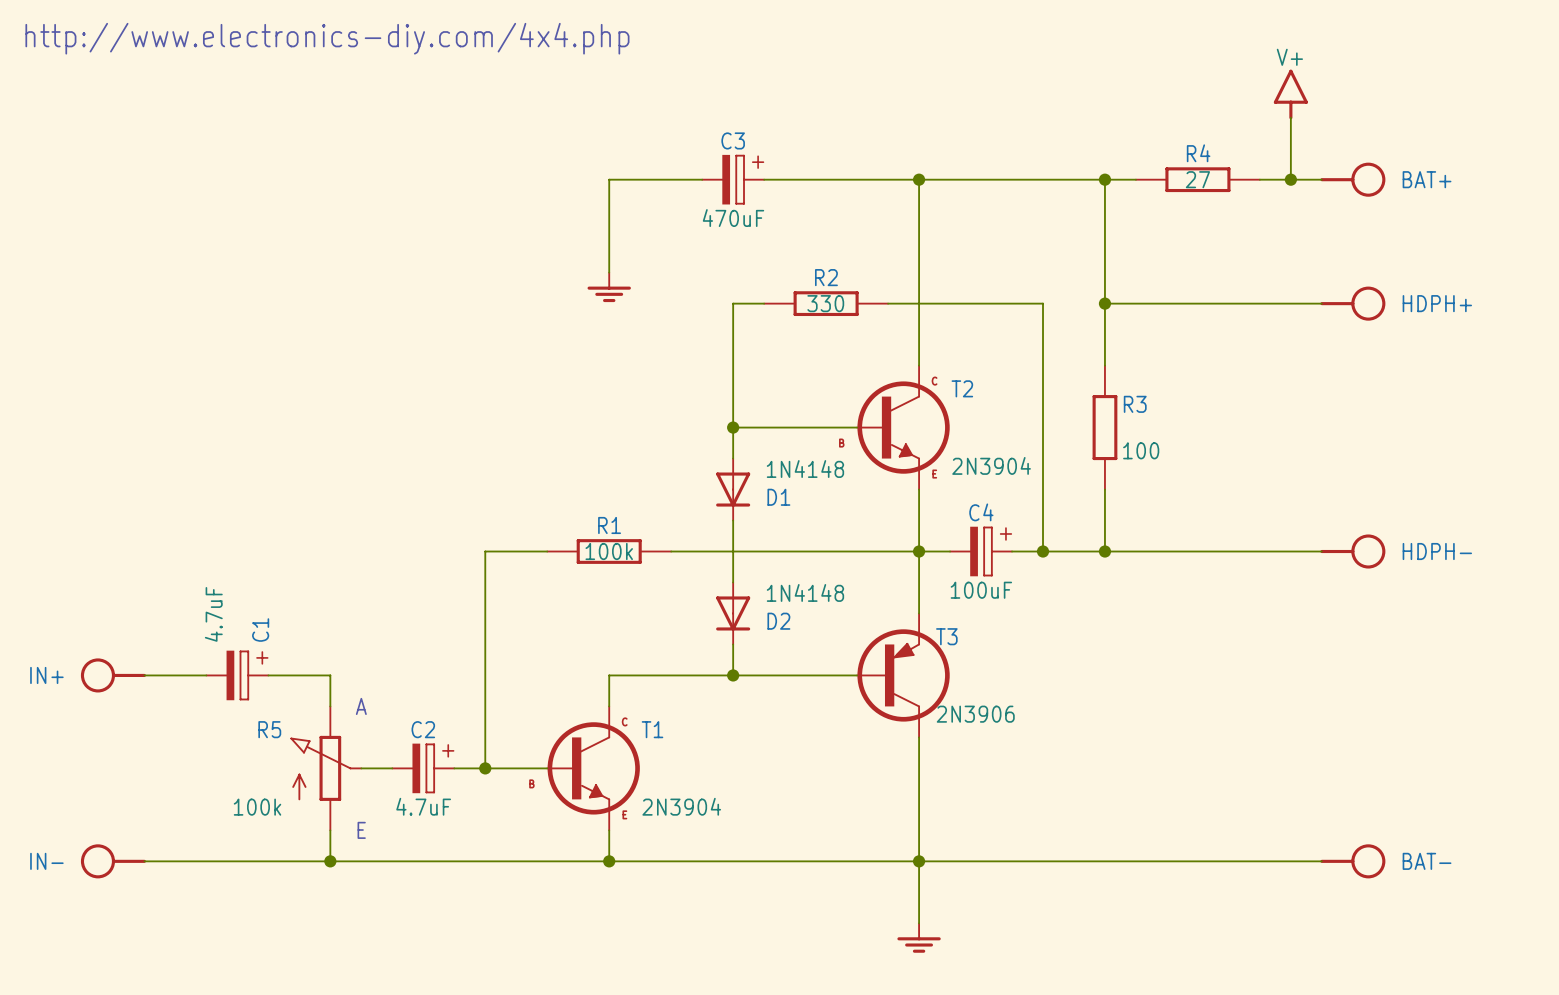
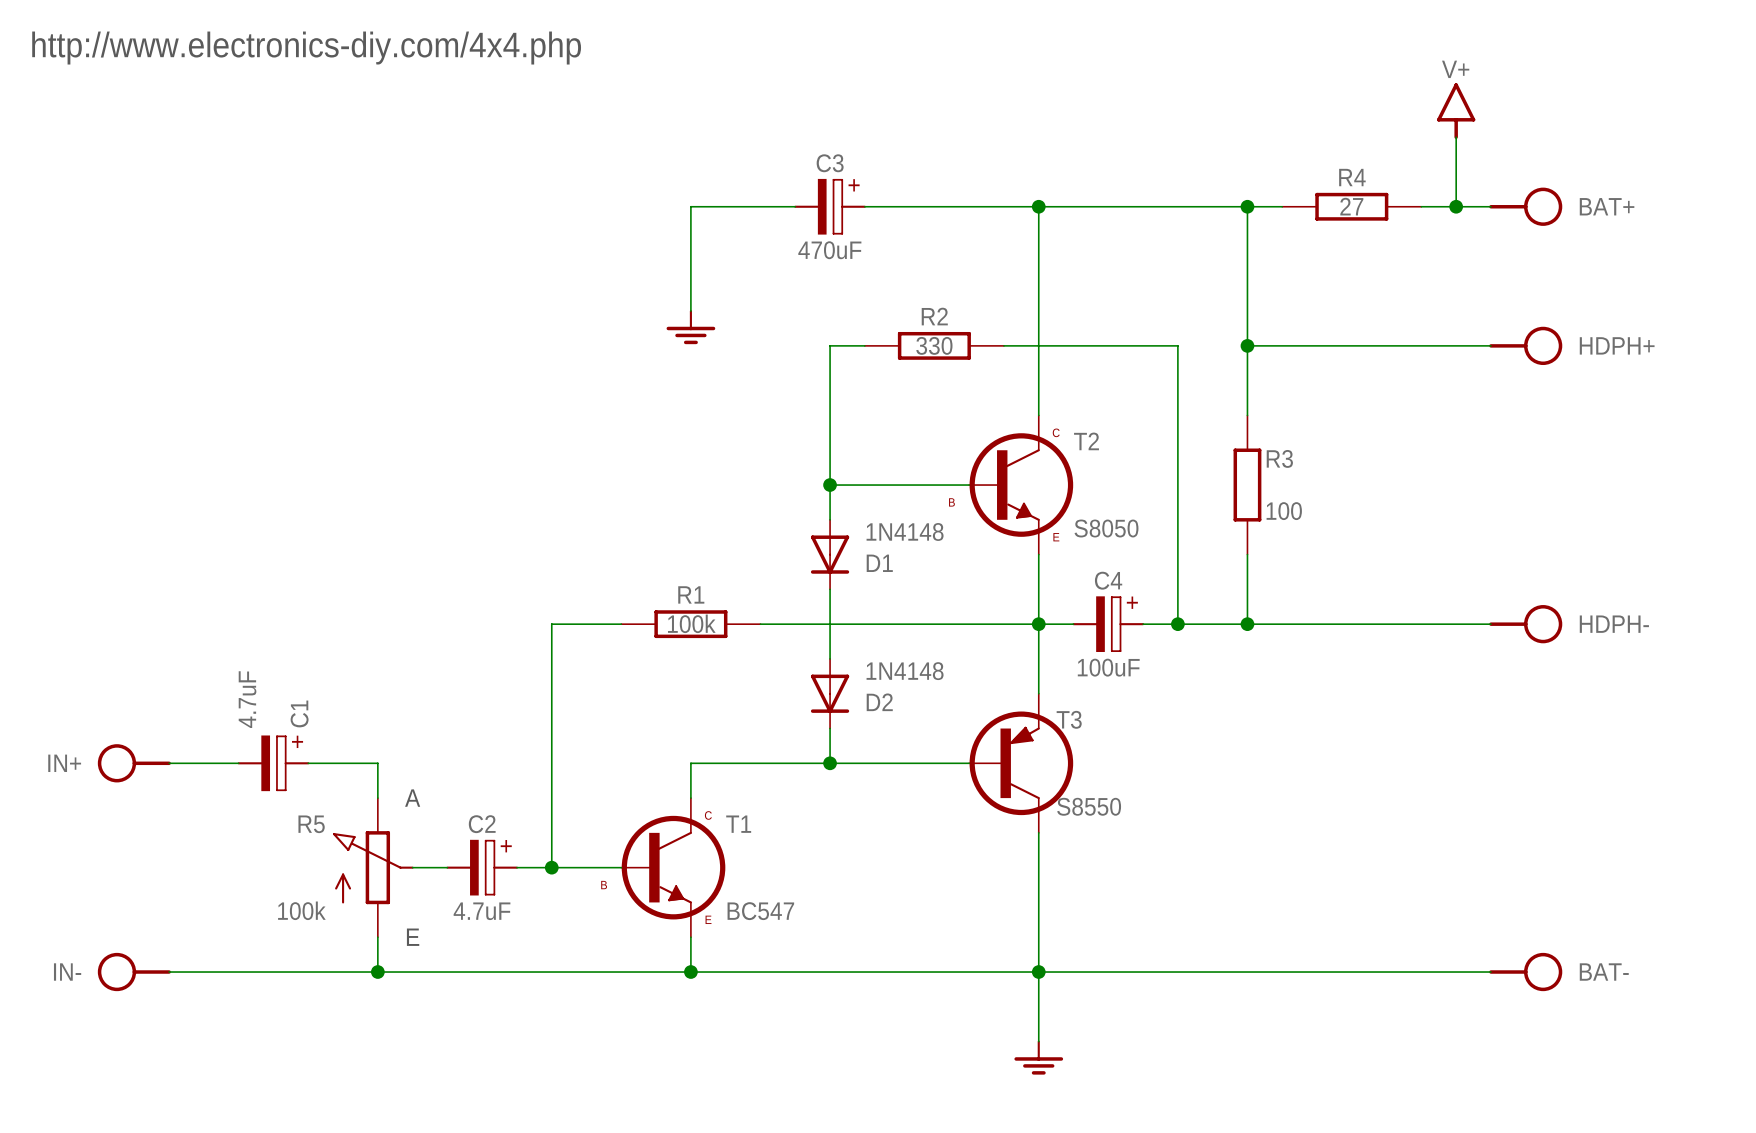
T2 value: 2N3904 (991, 465) -> S8050 (1106, 528)
T3 value: 2N3906 (975, 714) -> S8550 (1089, 806)
T1 value: 2N3904 (681, 806) -> BC547 (760, 911)

